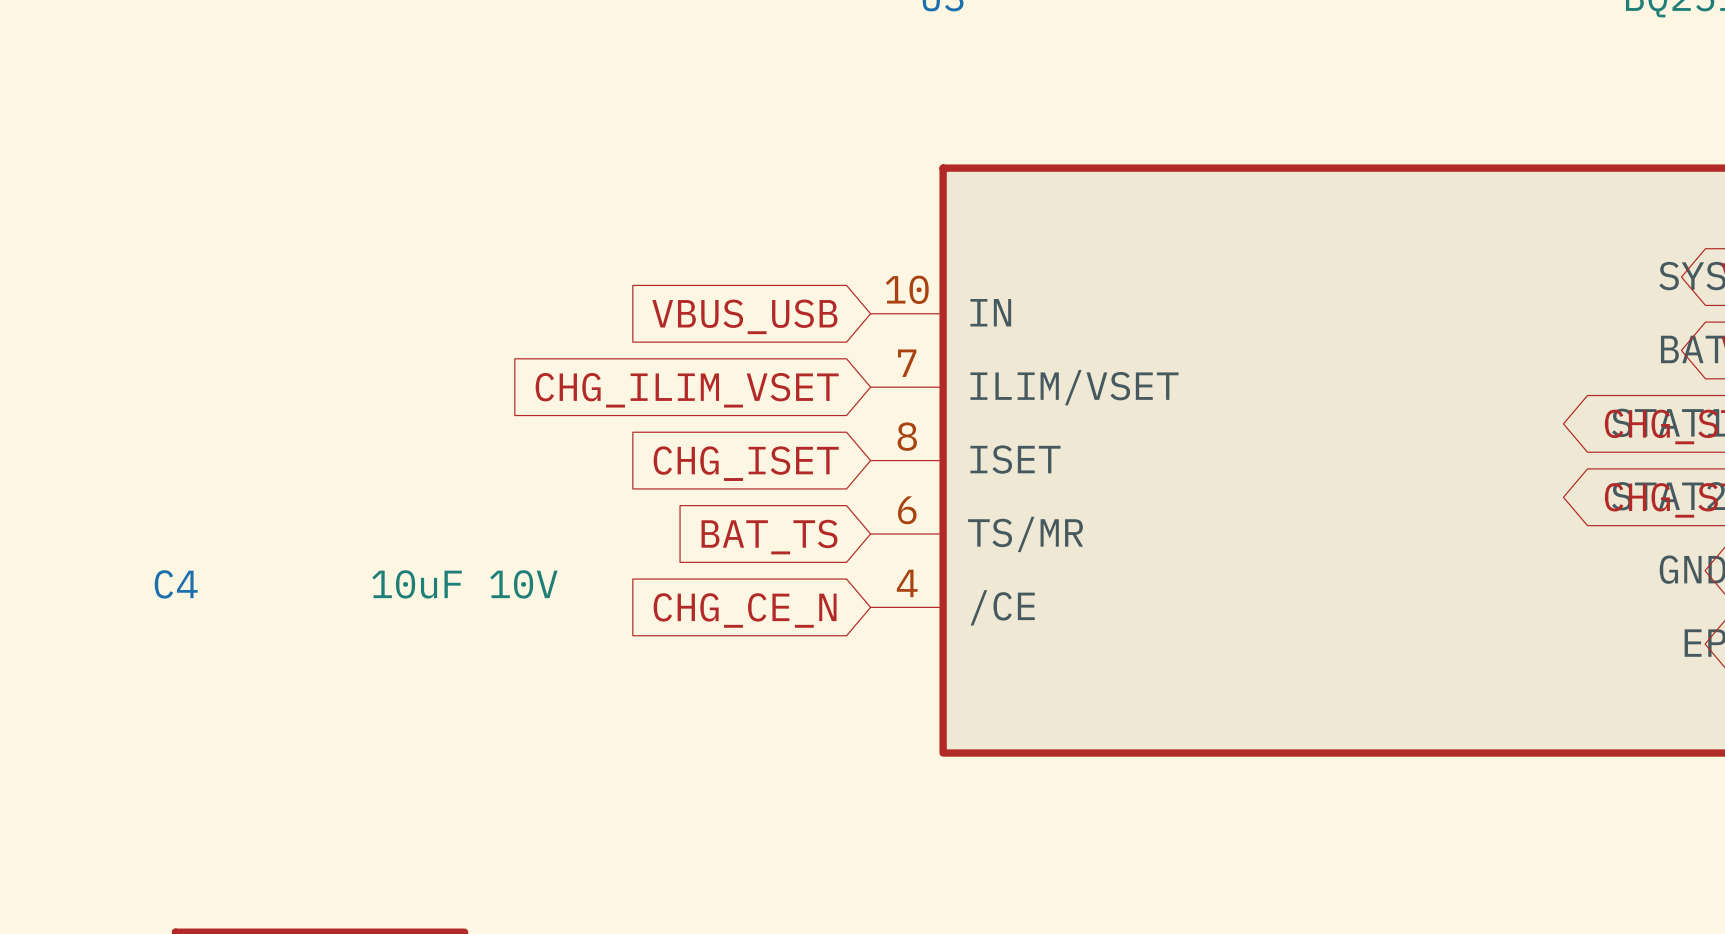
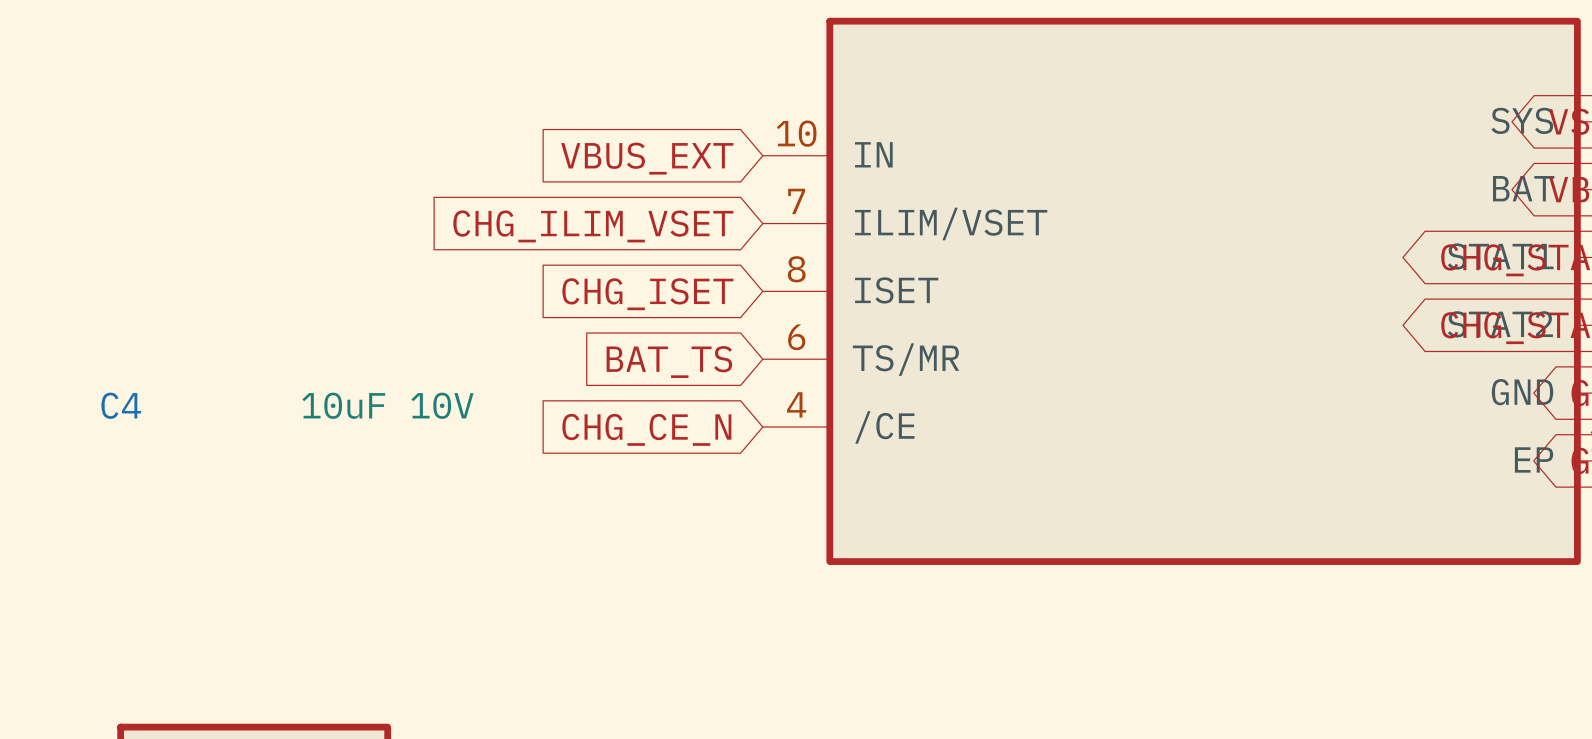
global label: VBUS_USB (744, 316) -> VBUS_EXT (647, 158)

